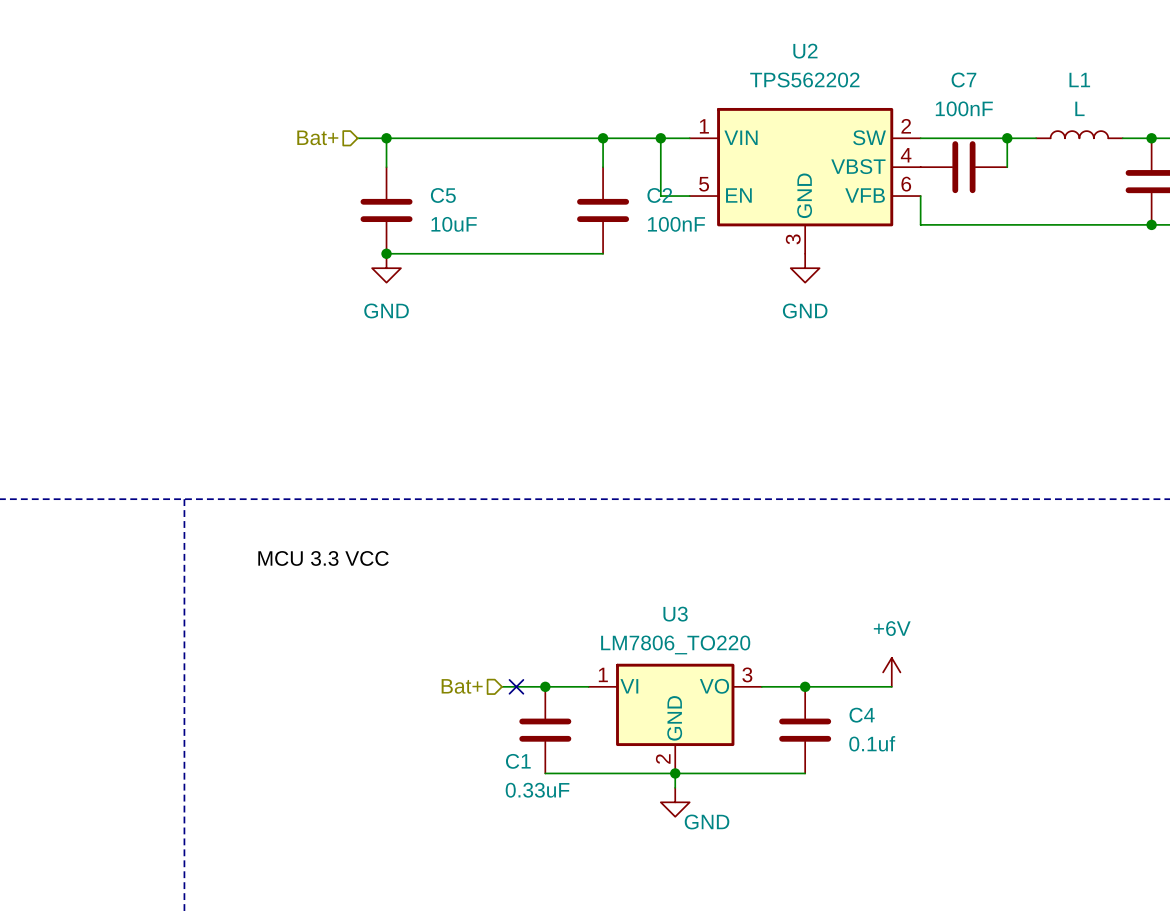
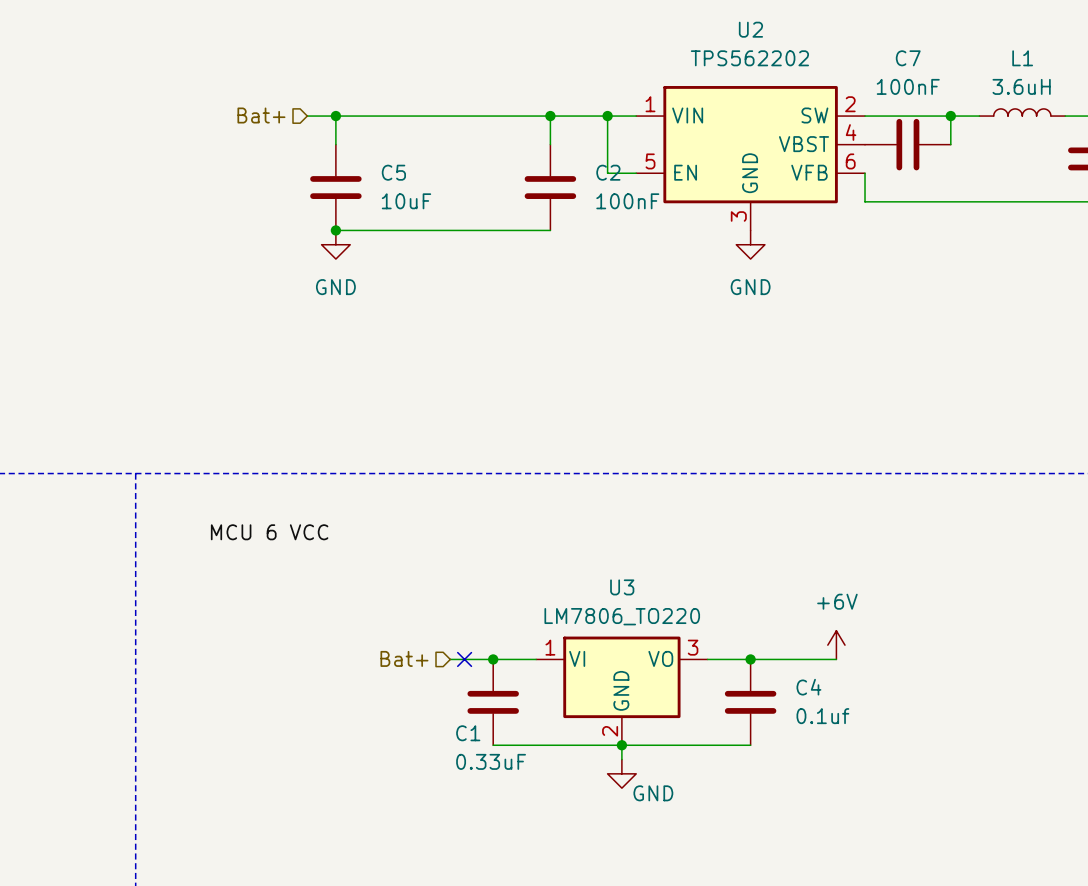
L1 value: L (1079, 108) -> 3.6uH (1021, 86)
label: MCU 3.3 VCC (323, 558) -> MCU 6 VCC (269, 532)

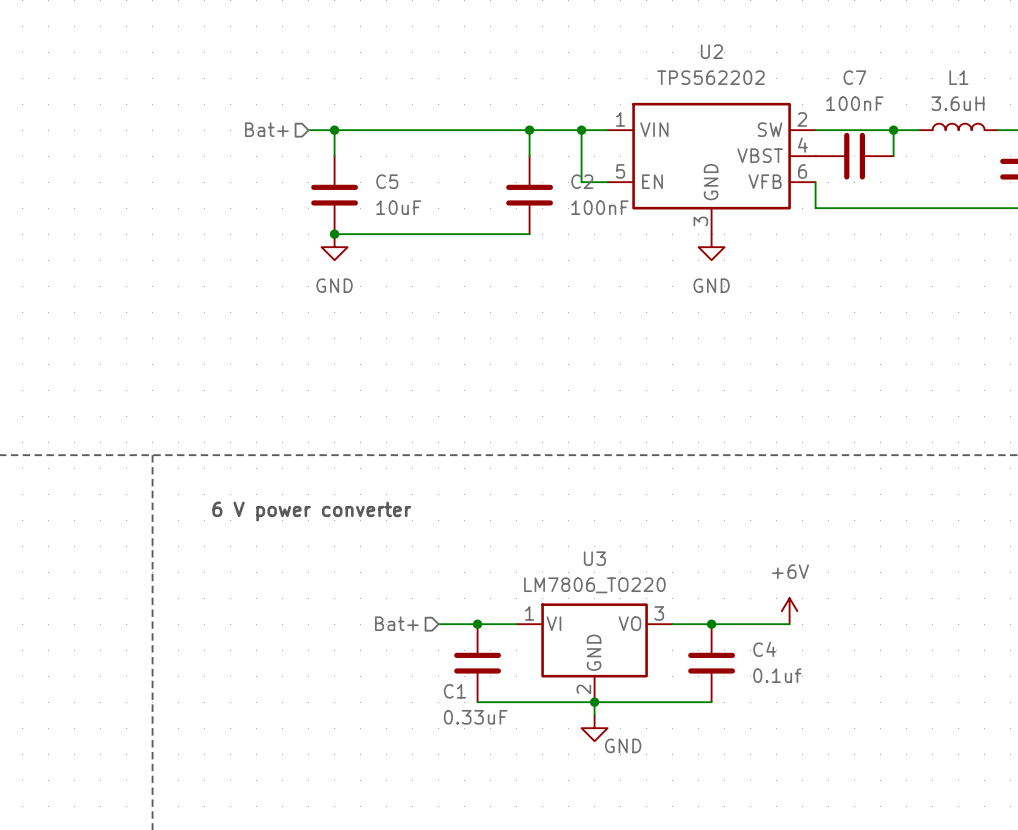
label: MCU 6 VCC (269, 532) -> none
text: none -> 6 V power converter (311, 511)
no-connect mark: (464, 659) -> none

